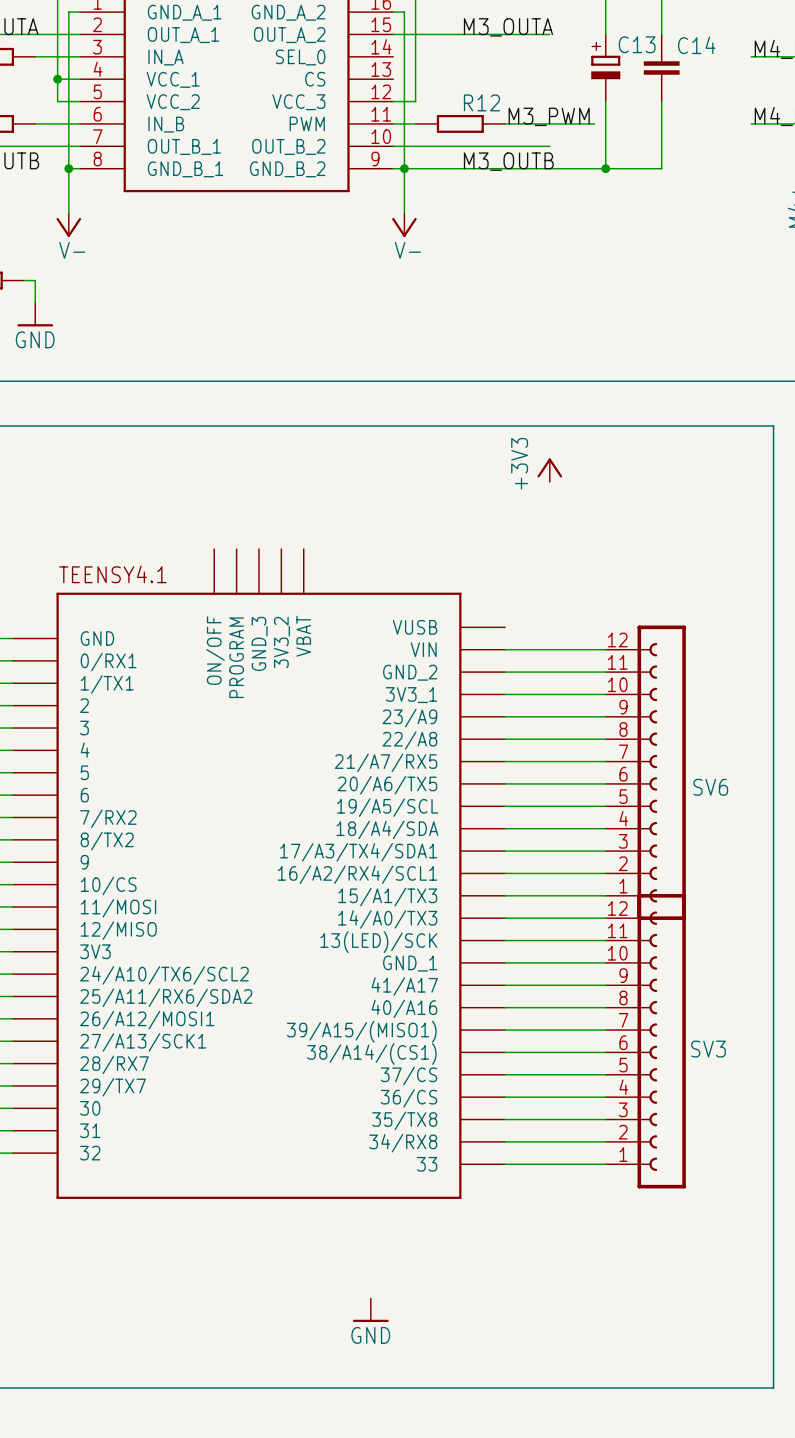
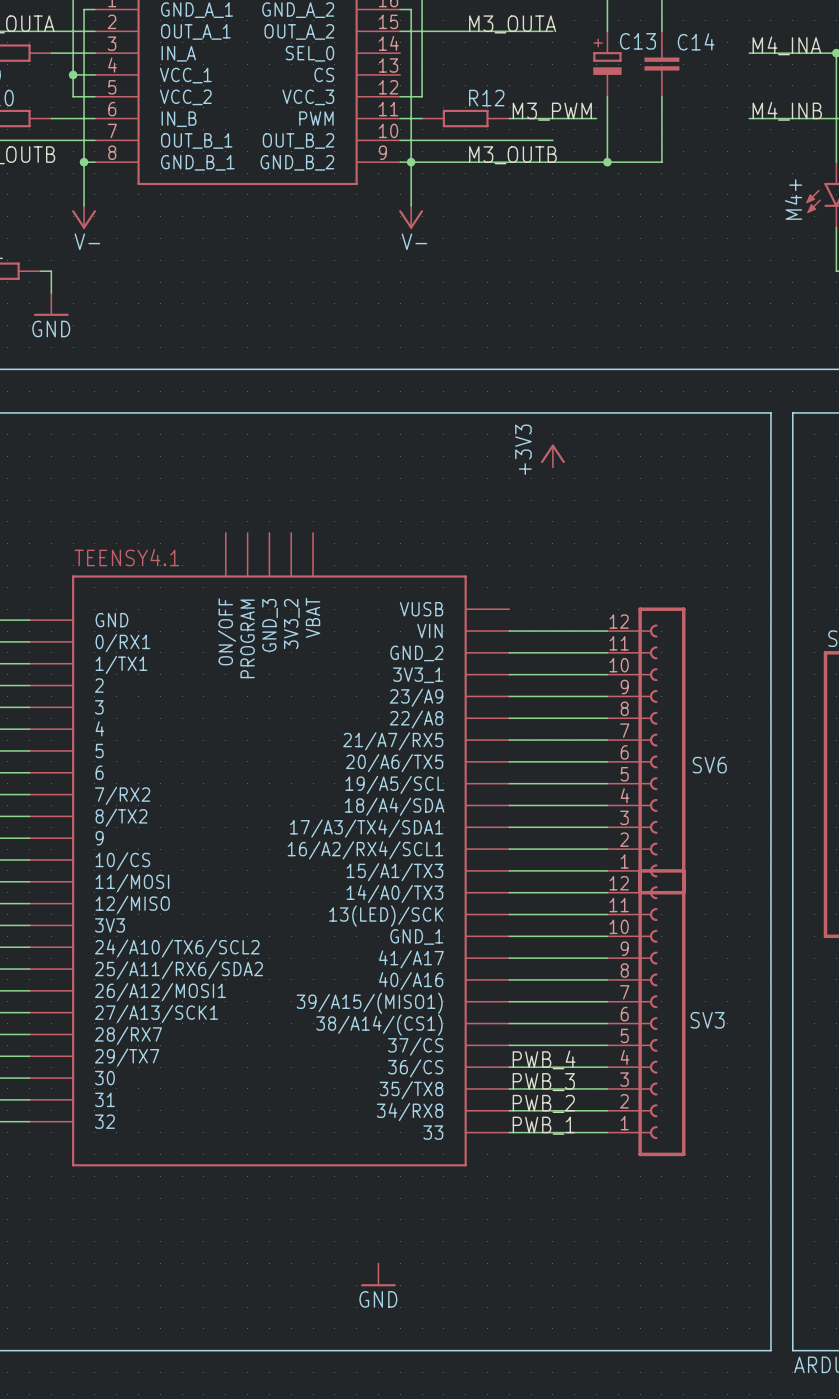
label: none -> PWB_4 (544, 1059)
label: none -> PWB_3 (543, 1082)
label: none -> PWB_2 (543, 1103)
label: none -> PWB_1 (543, 1125)

